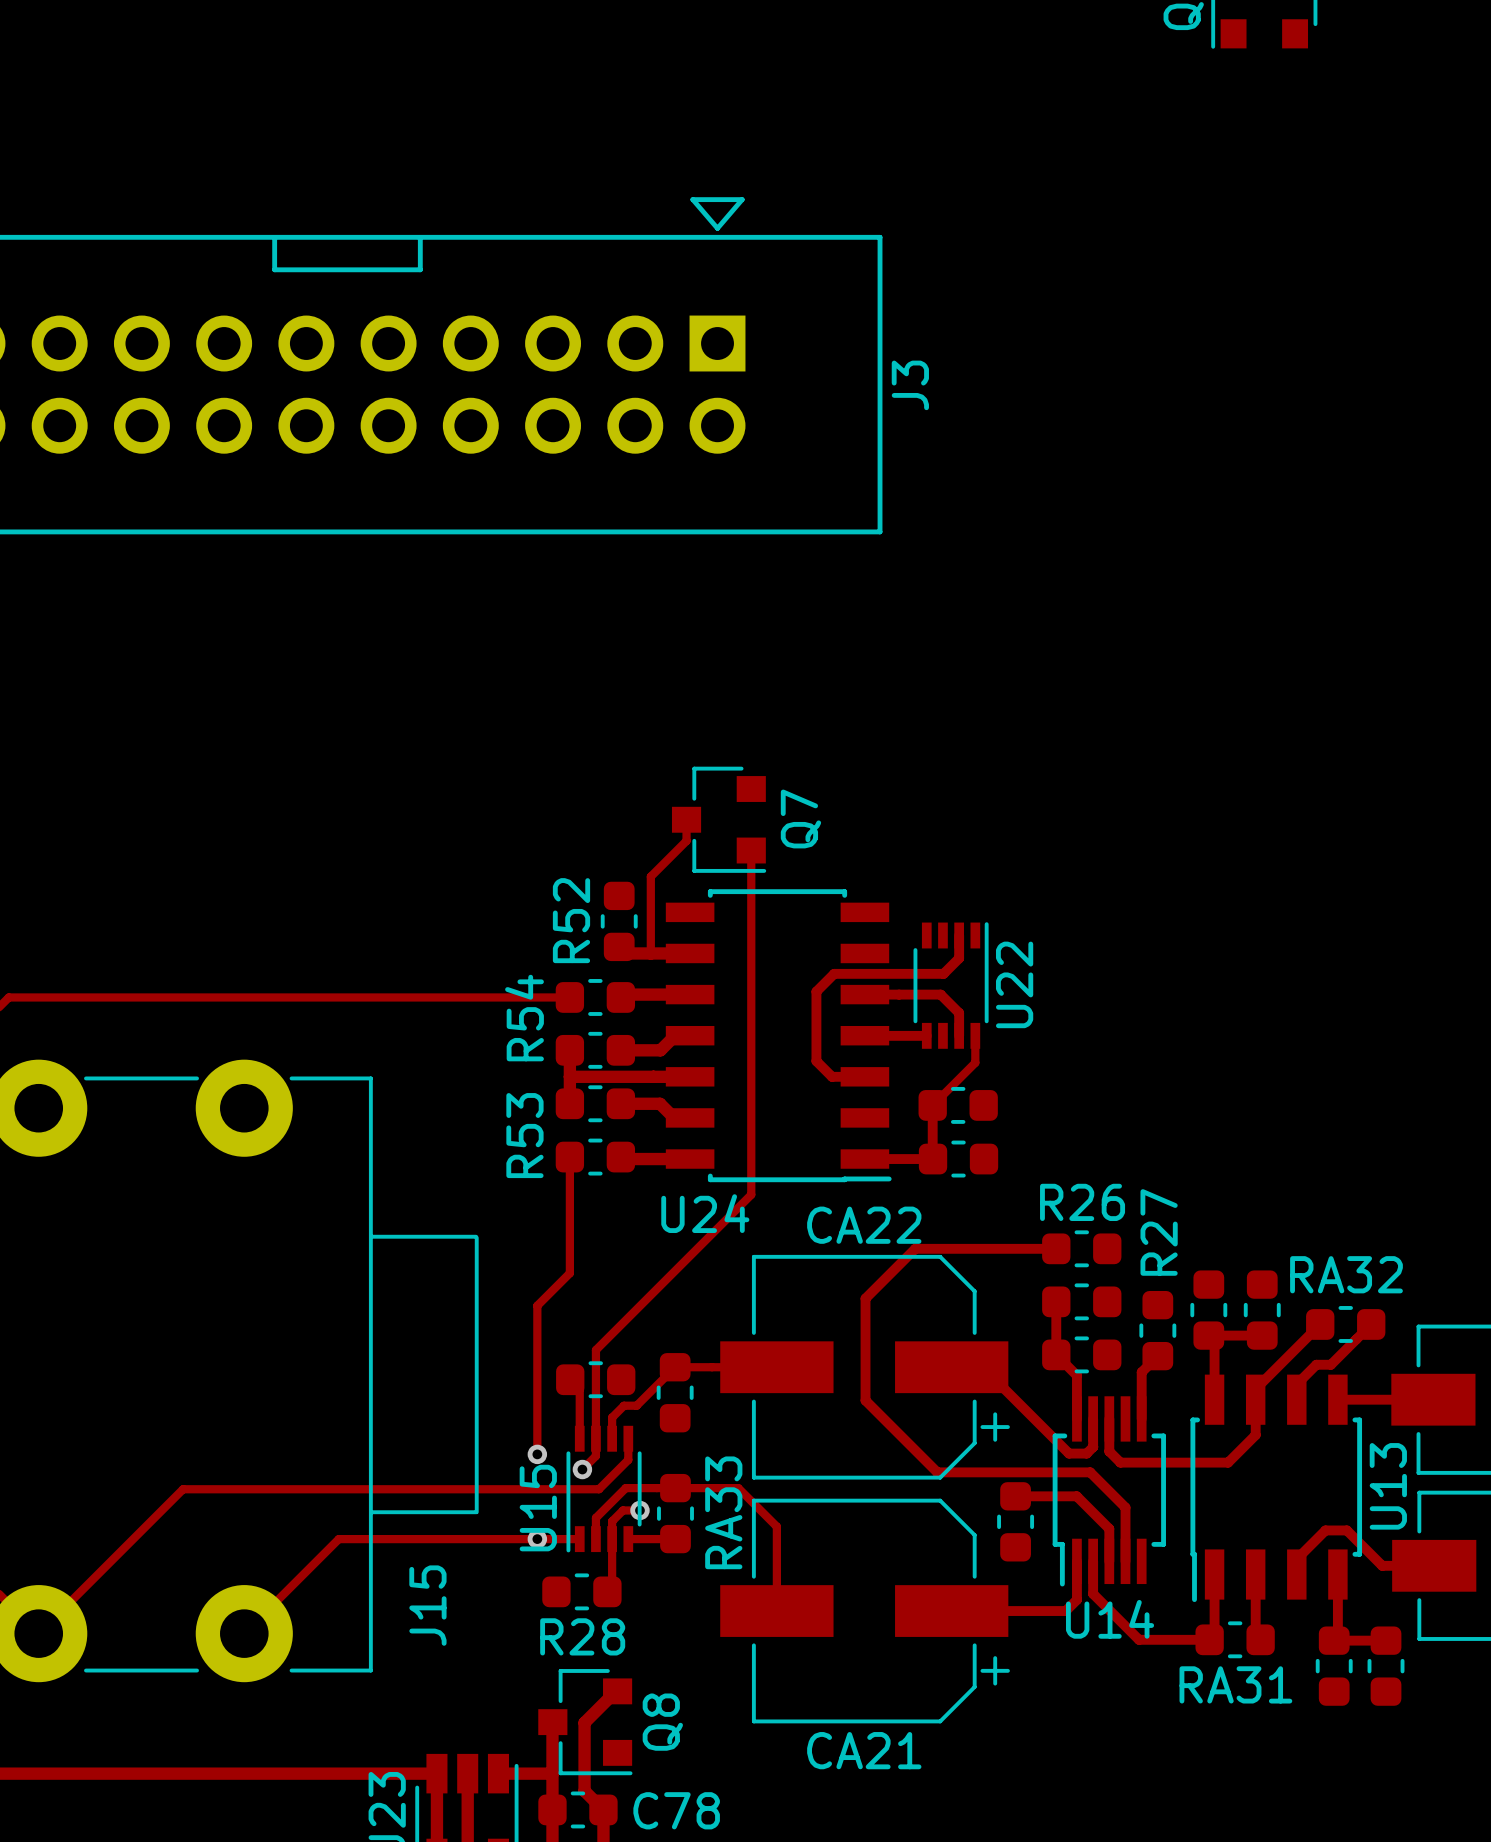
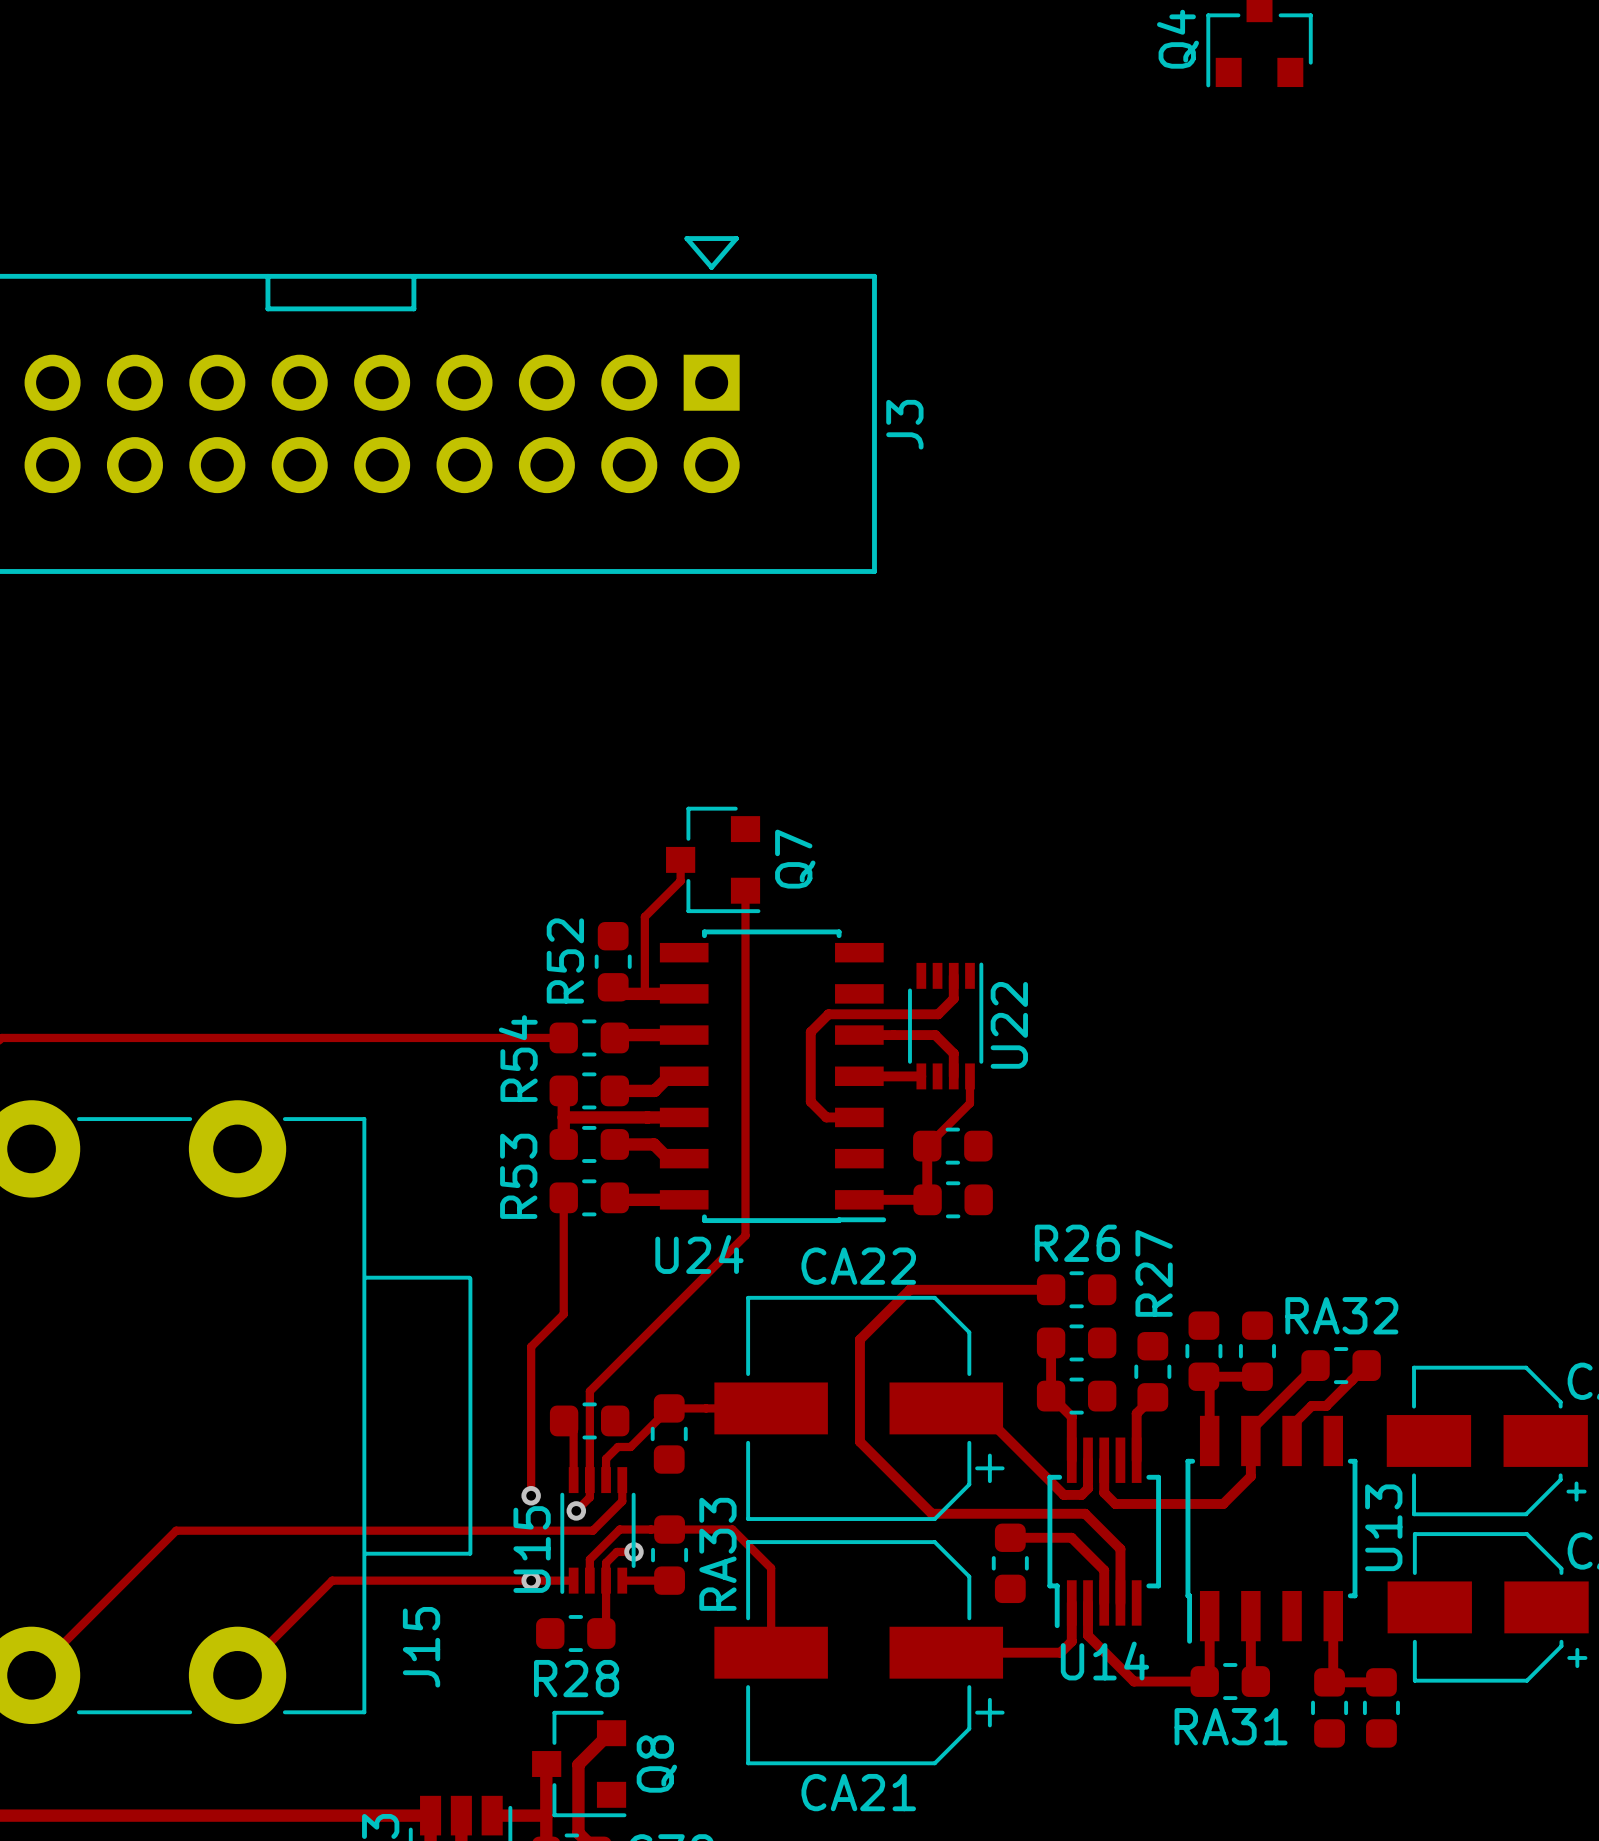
track: (1337, 1399) (1433, 1399) -> none
track: (1296, 1559) (1325, 1530) (1346, 1530) (1382, 1565) (1434, 1565) -> none

